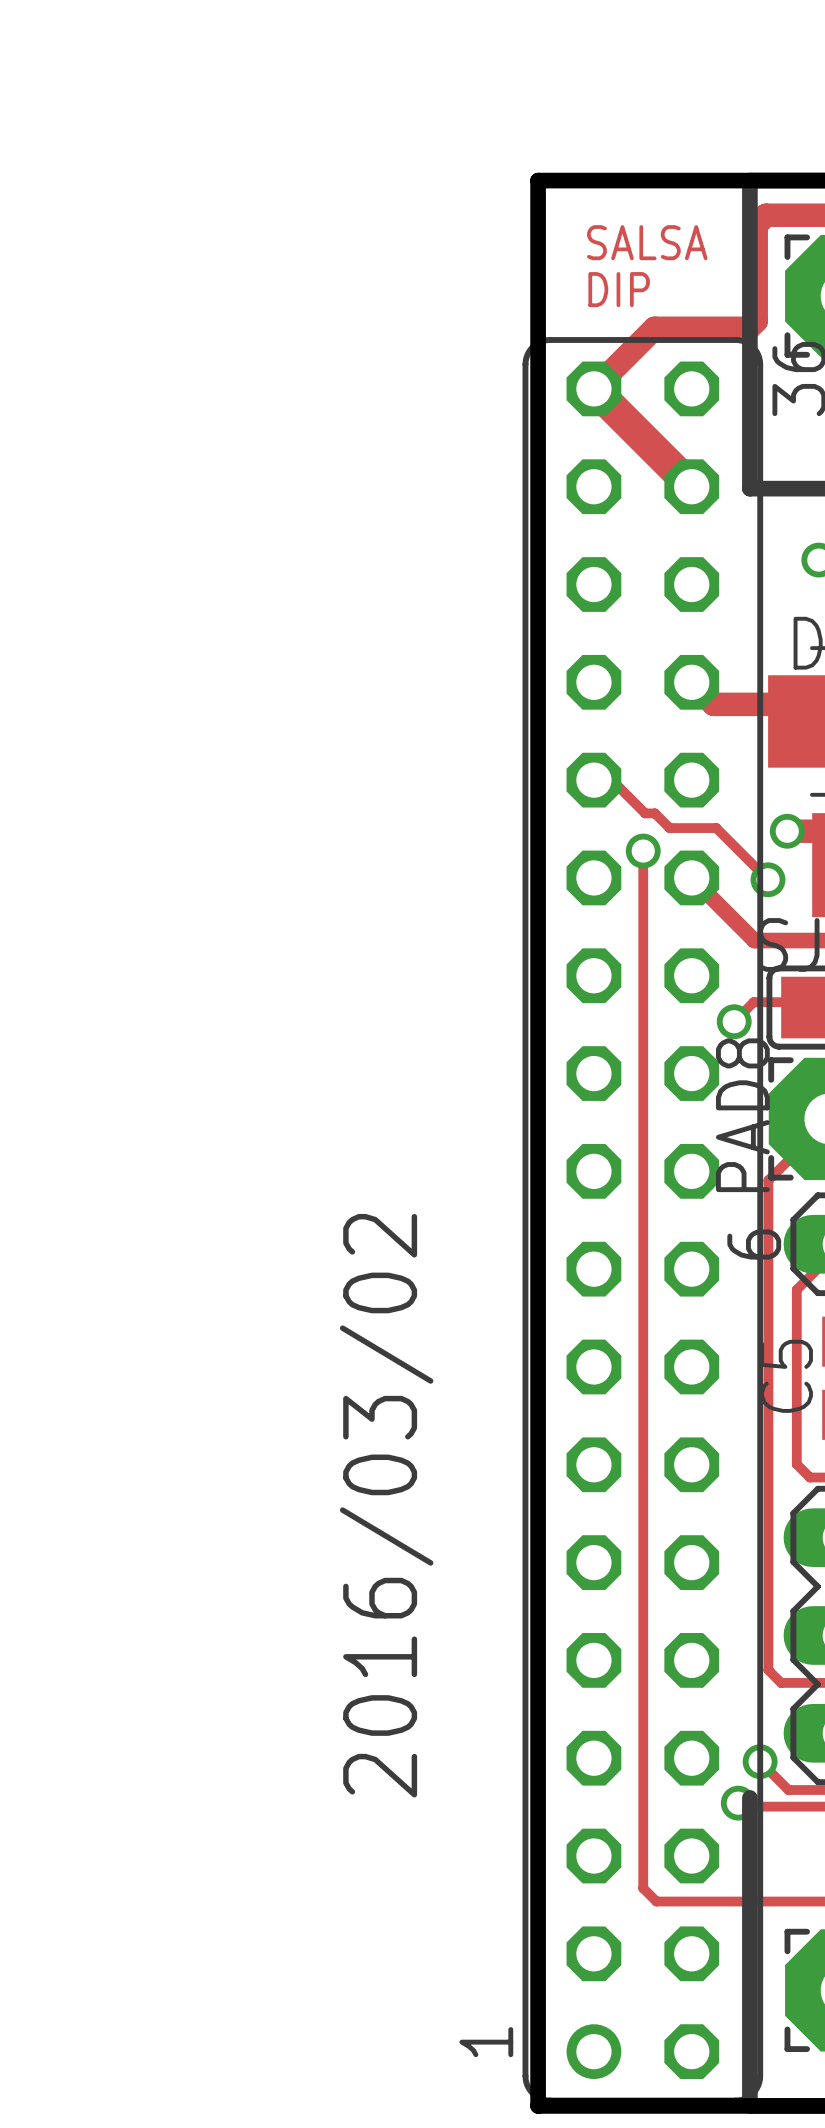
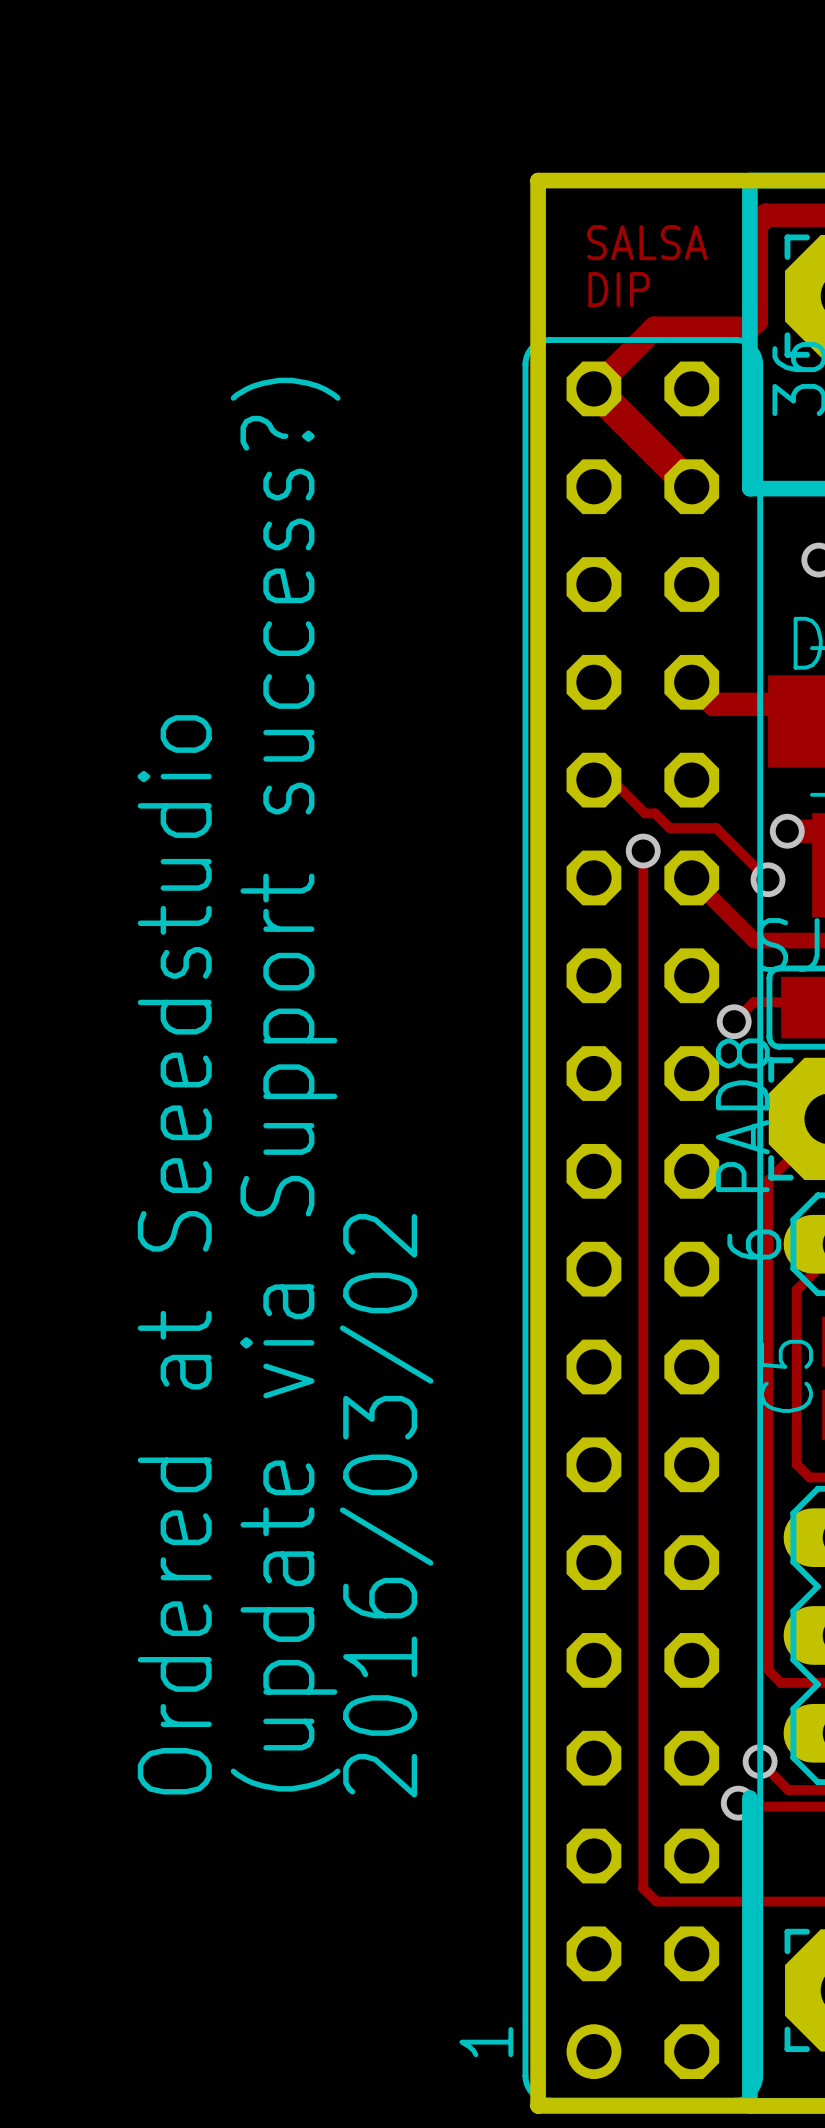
text: none -> (update via Support success?) (285, 1084)
text: none -> Ordered at Seeedstudio (174, 1254)

